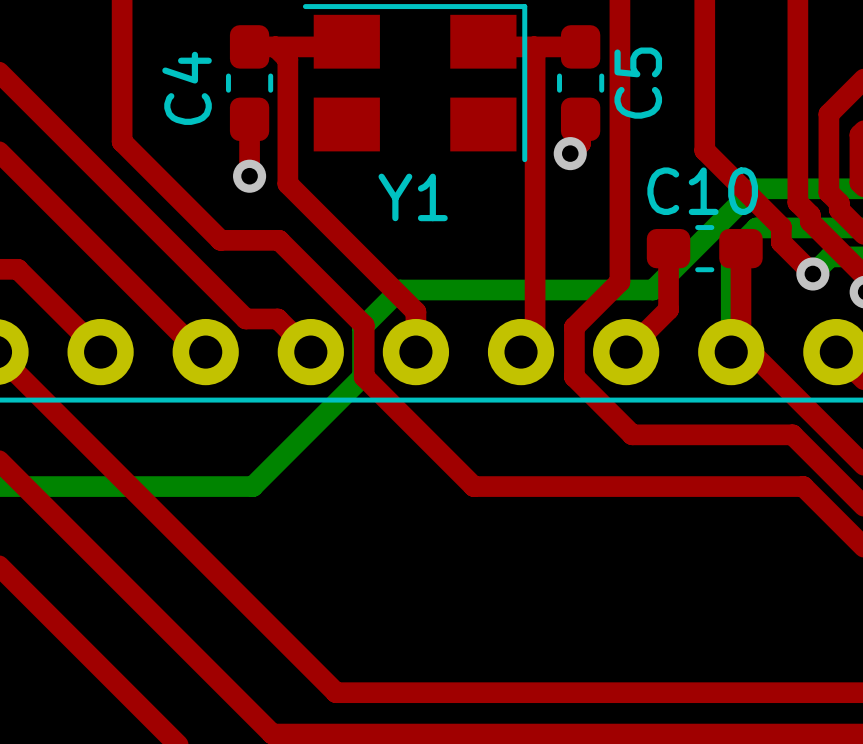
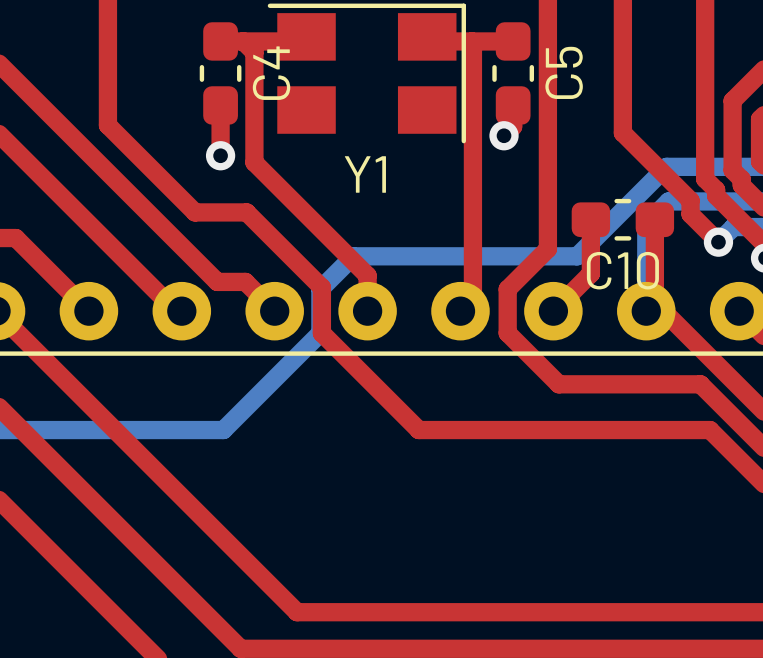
C4 name position: C4 (187, 88) -> C4 (271, 73)
C10 name position: C10 (702, 191) -> C10 (622, 270)

